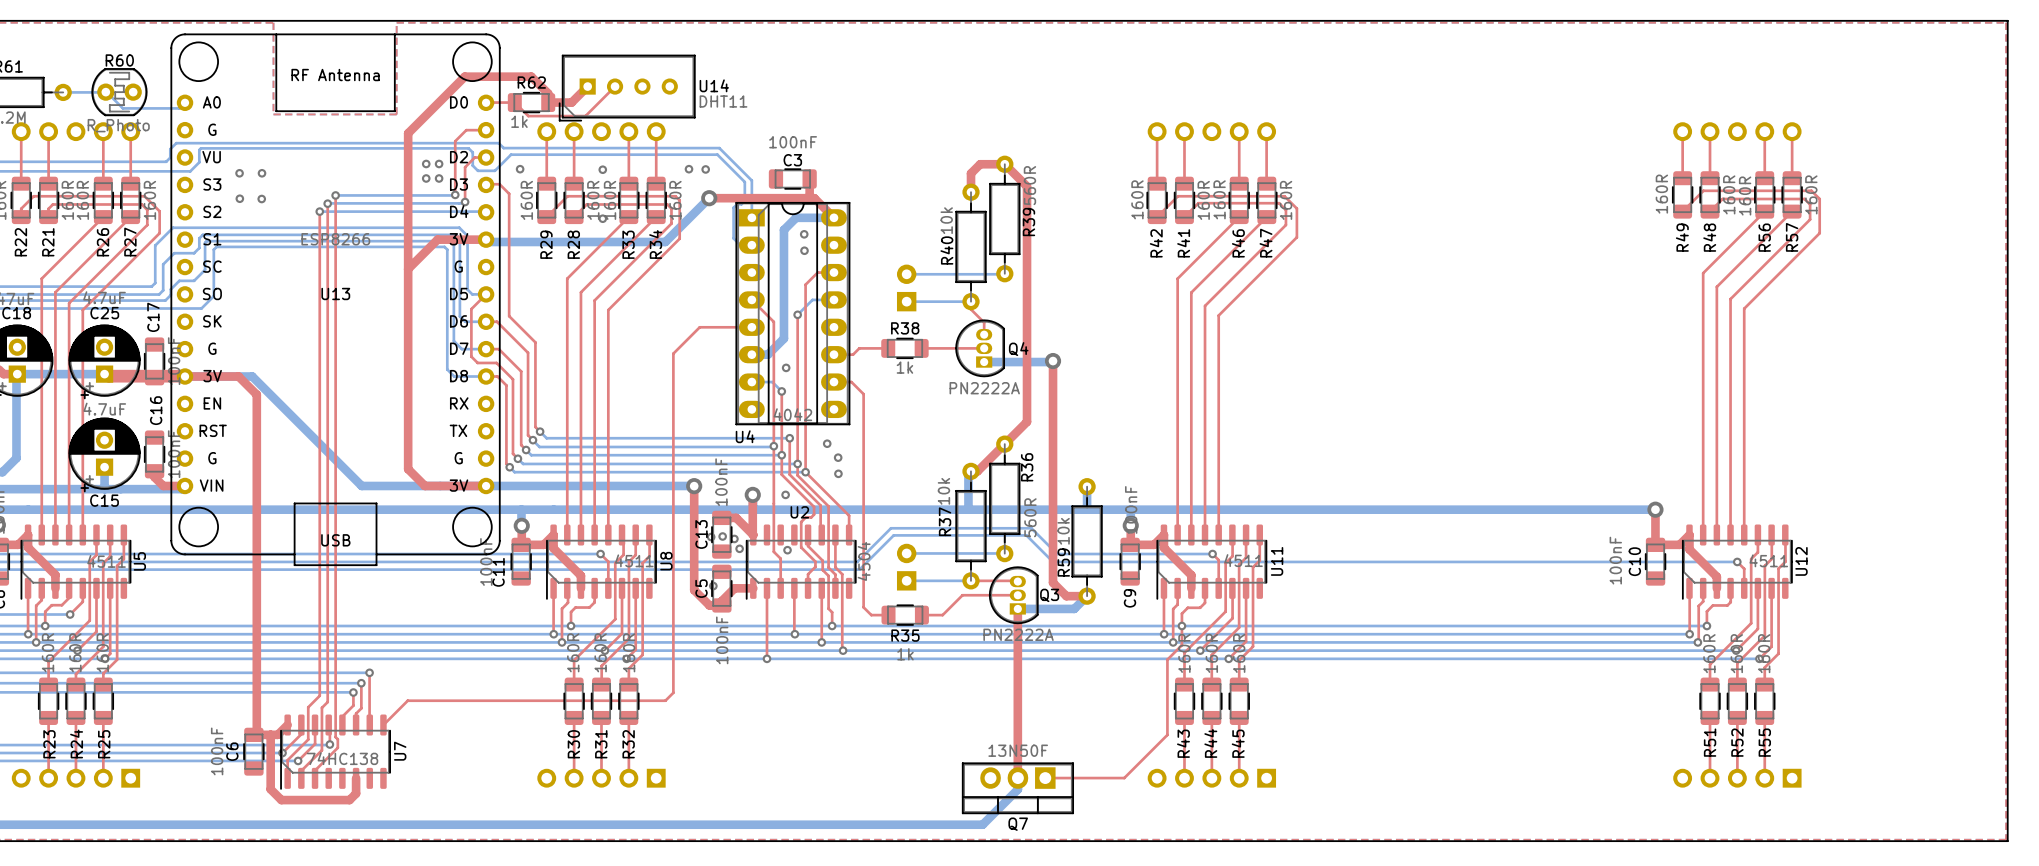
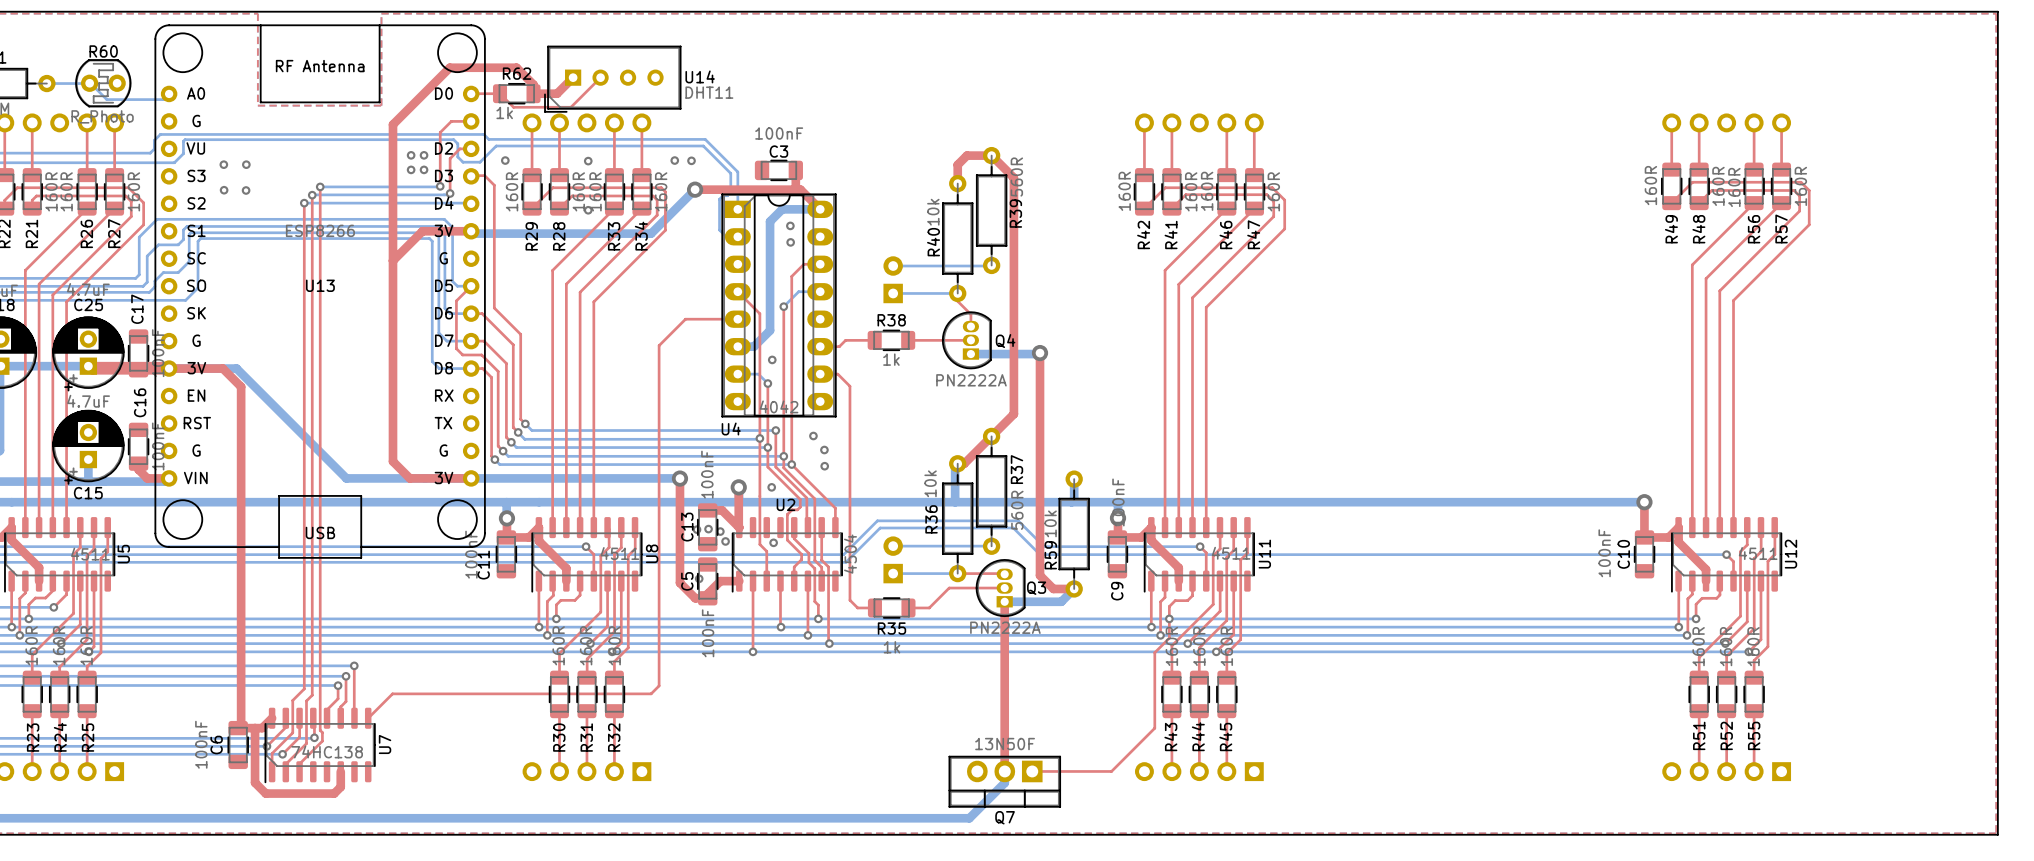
R36 name position: R36 (1027, 467) -> R36 (931, 519)
R37 name position: R37 (945, 521) -> R37 (1016, 469)

